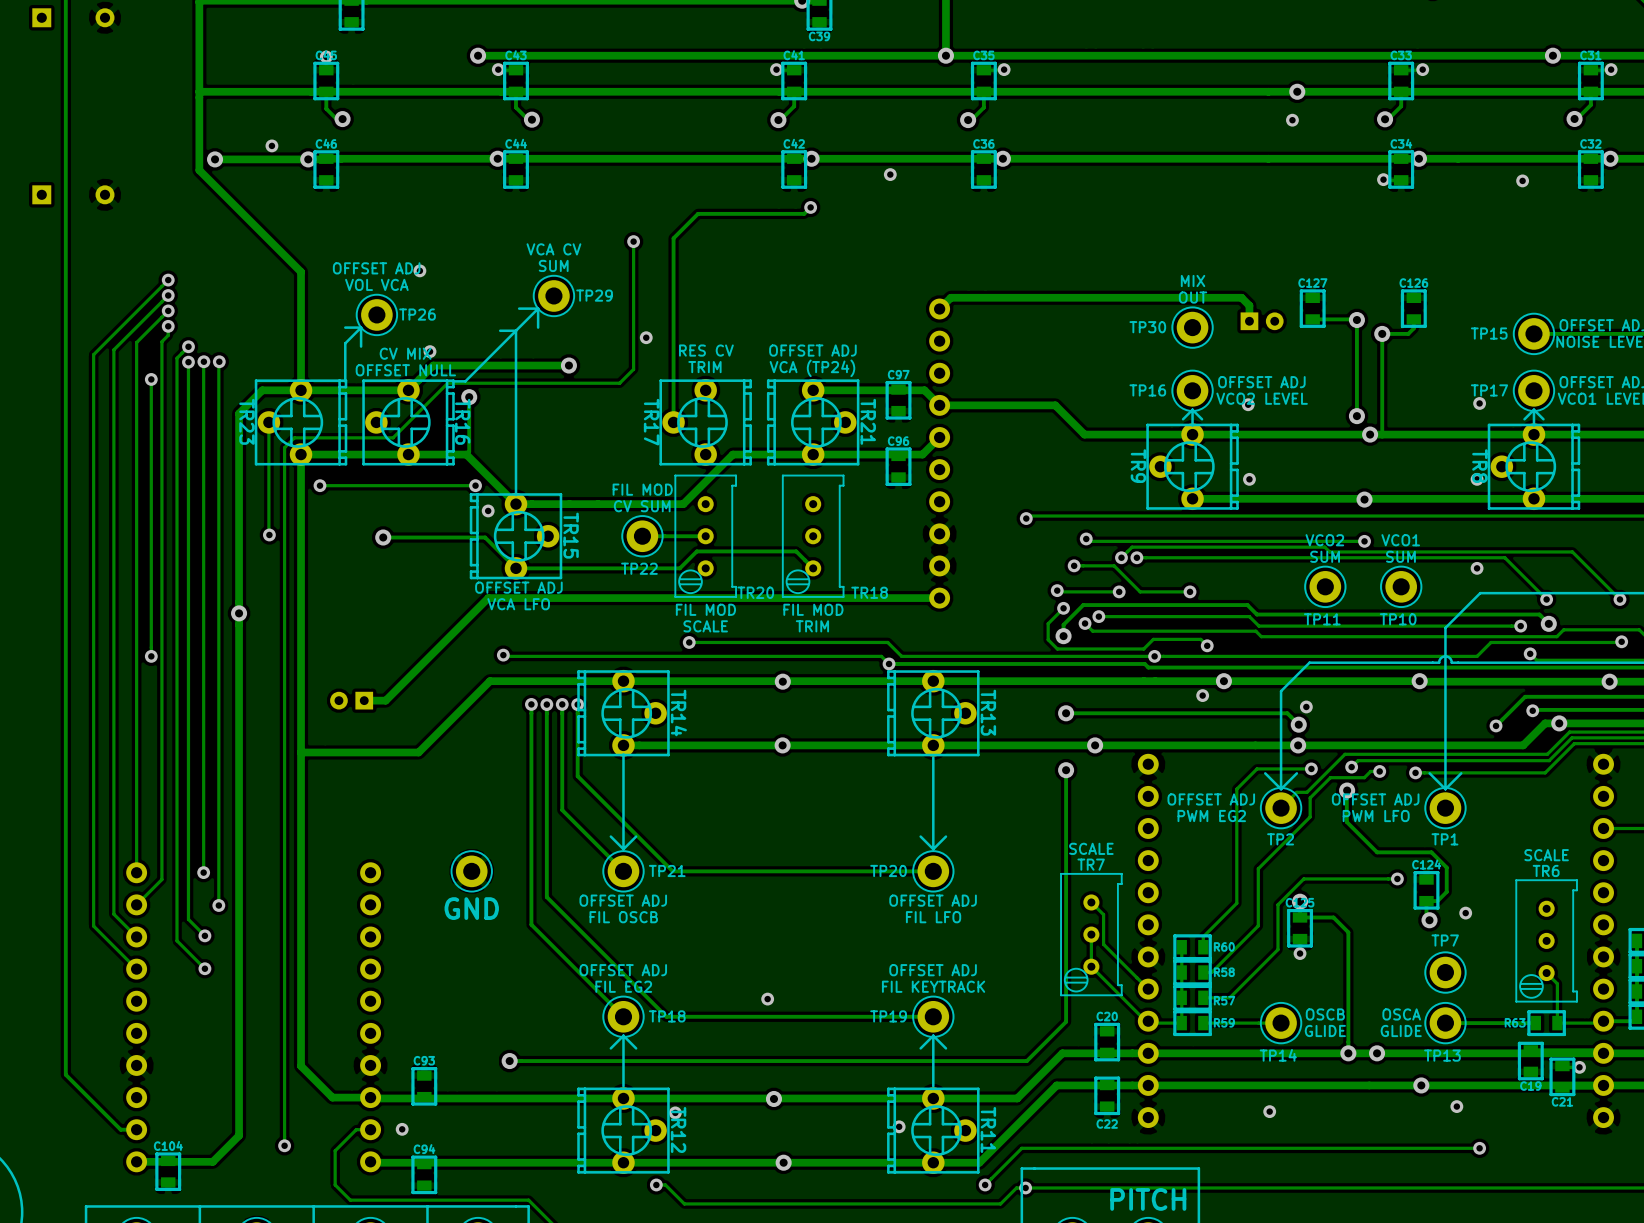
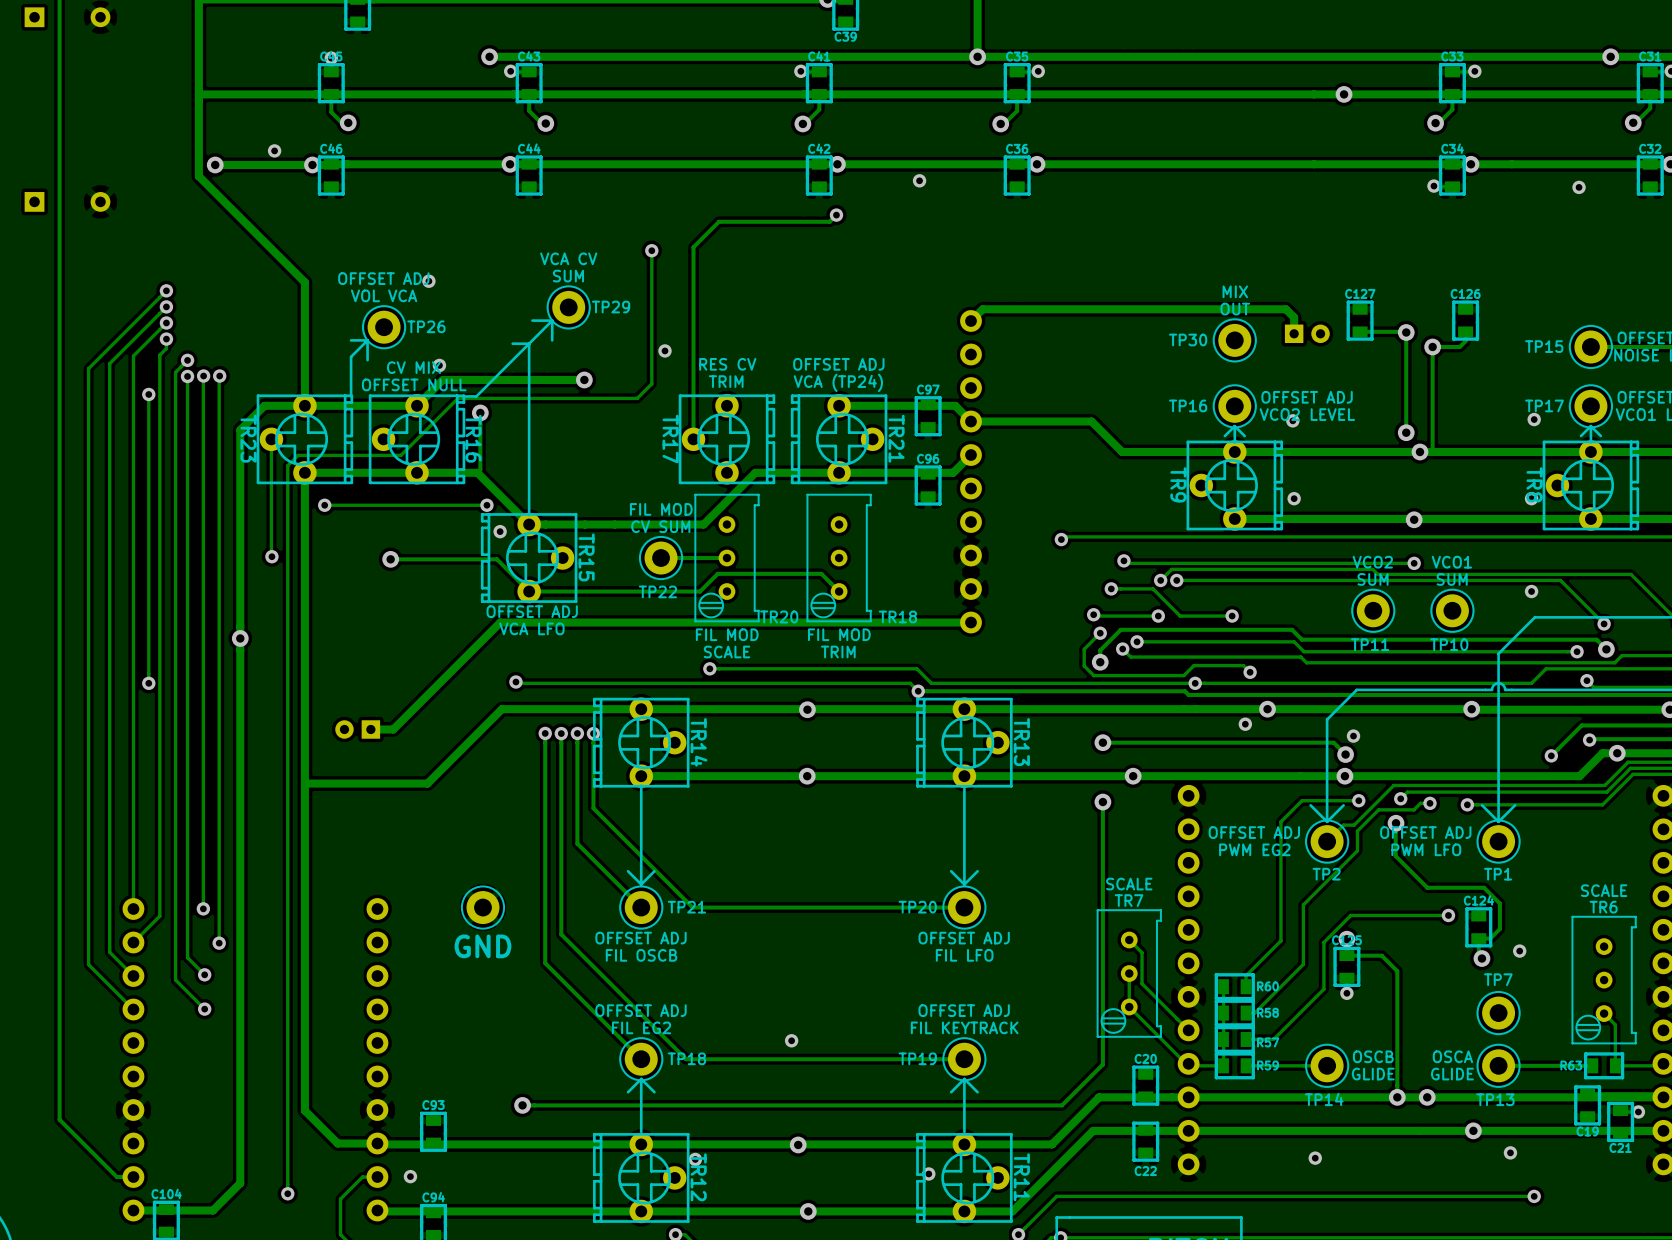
via: (1292, 120) -> none

